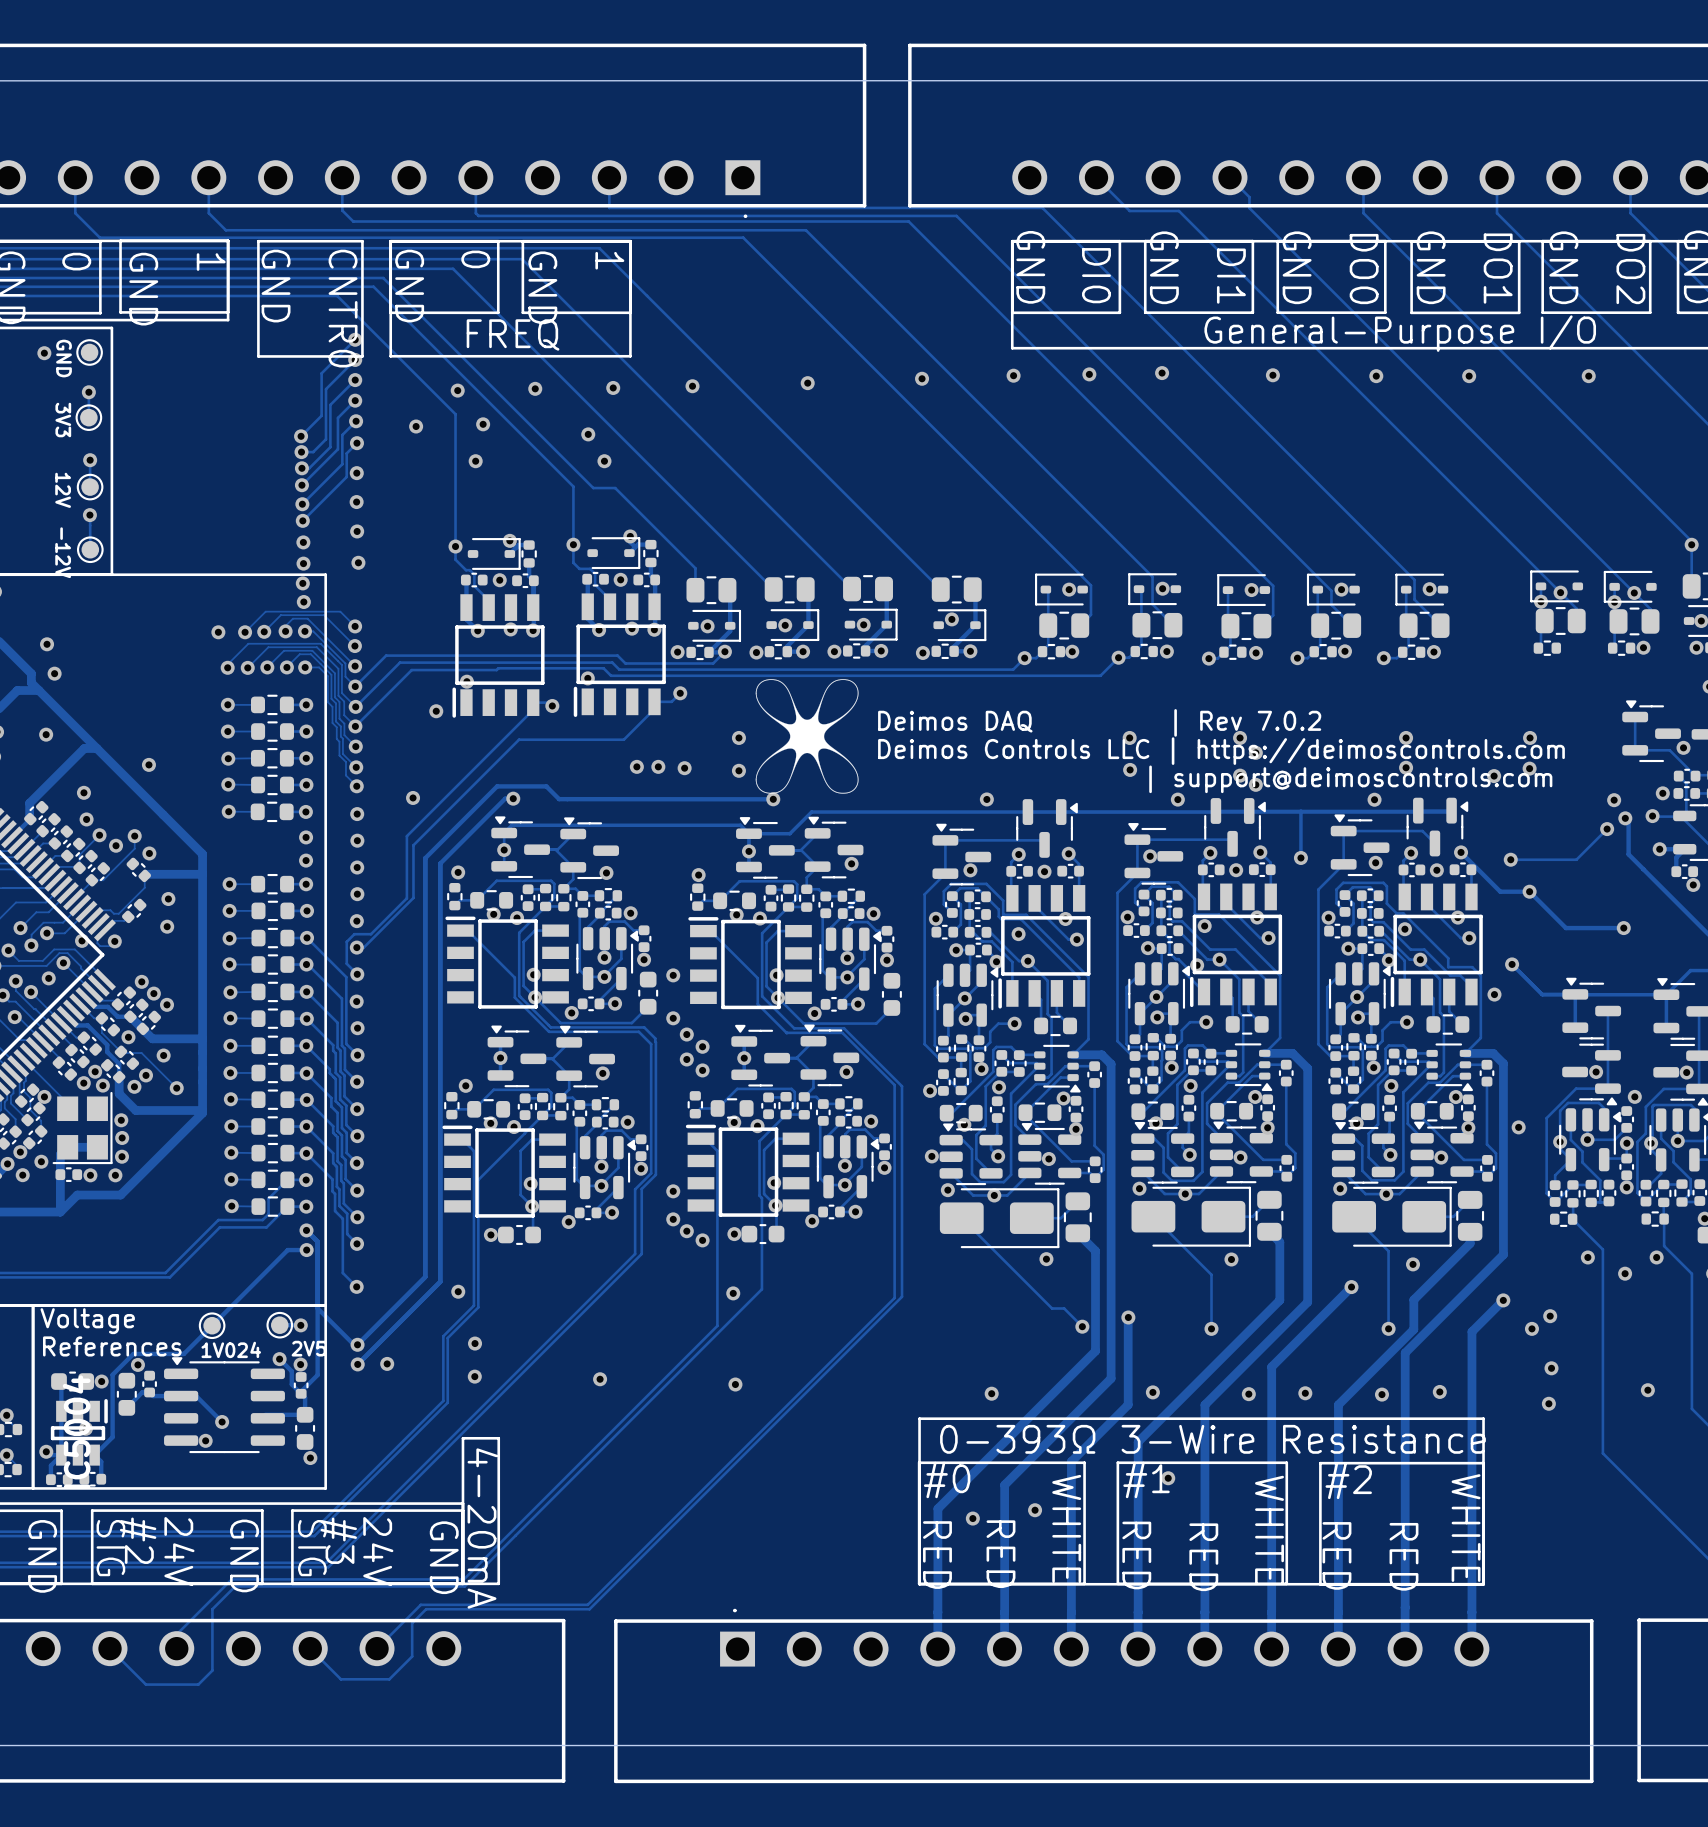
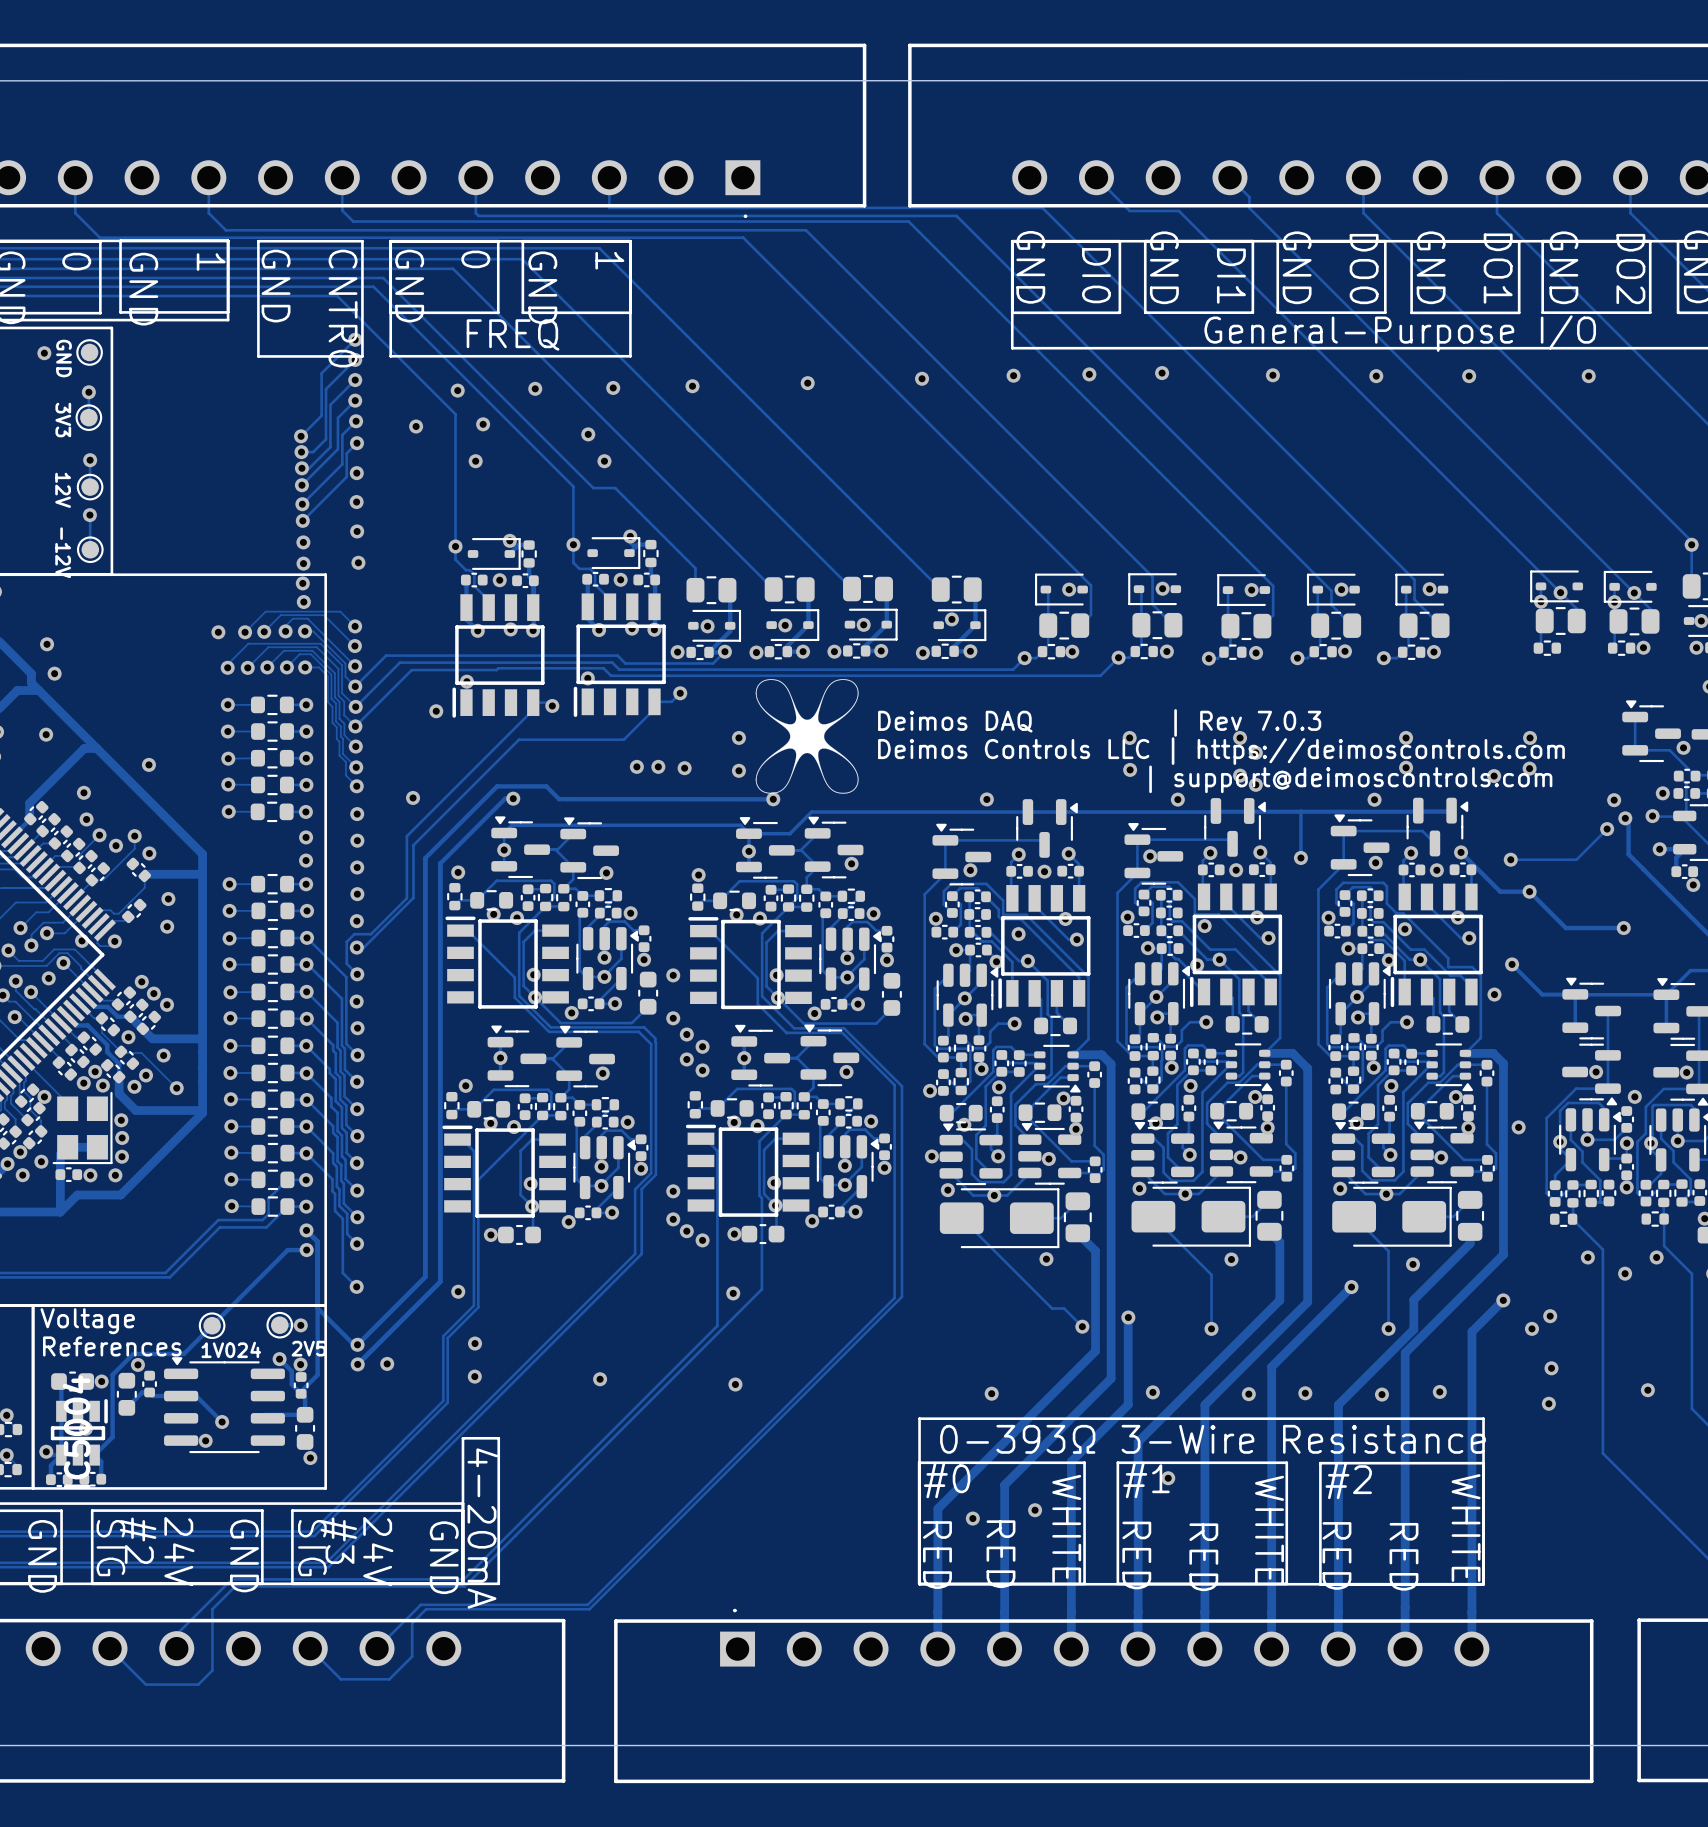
text: Deimos DAQ | Rev 7.0.2 (1099, 722) -> Deimos DAQ | Rev 7.0.3 (1099, 722)

